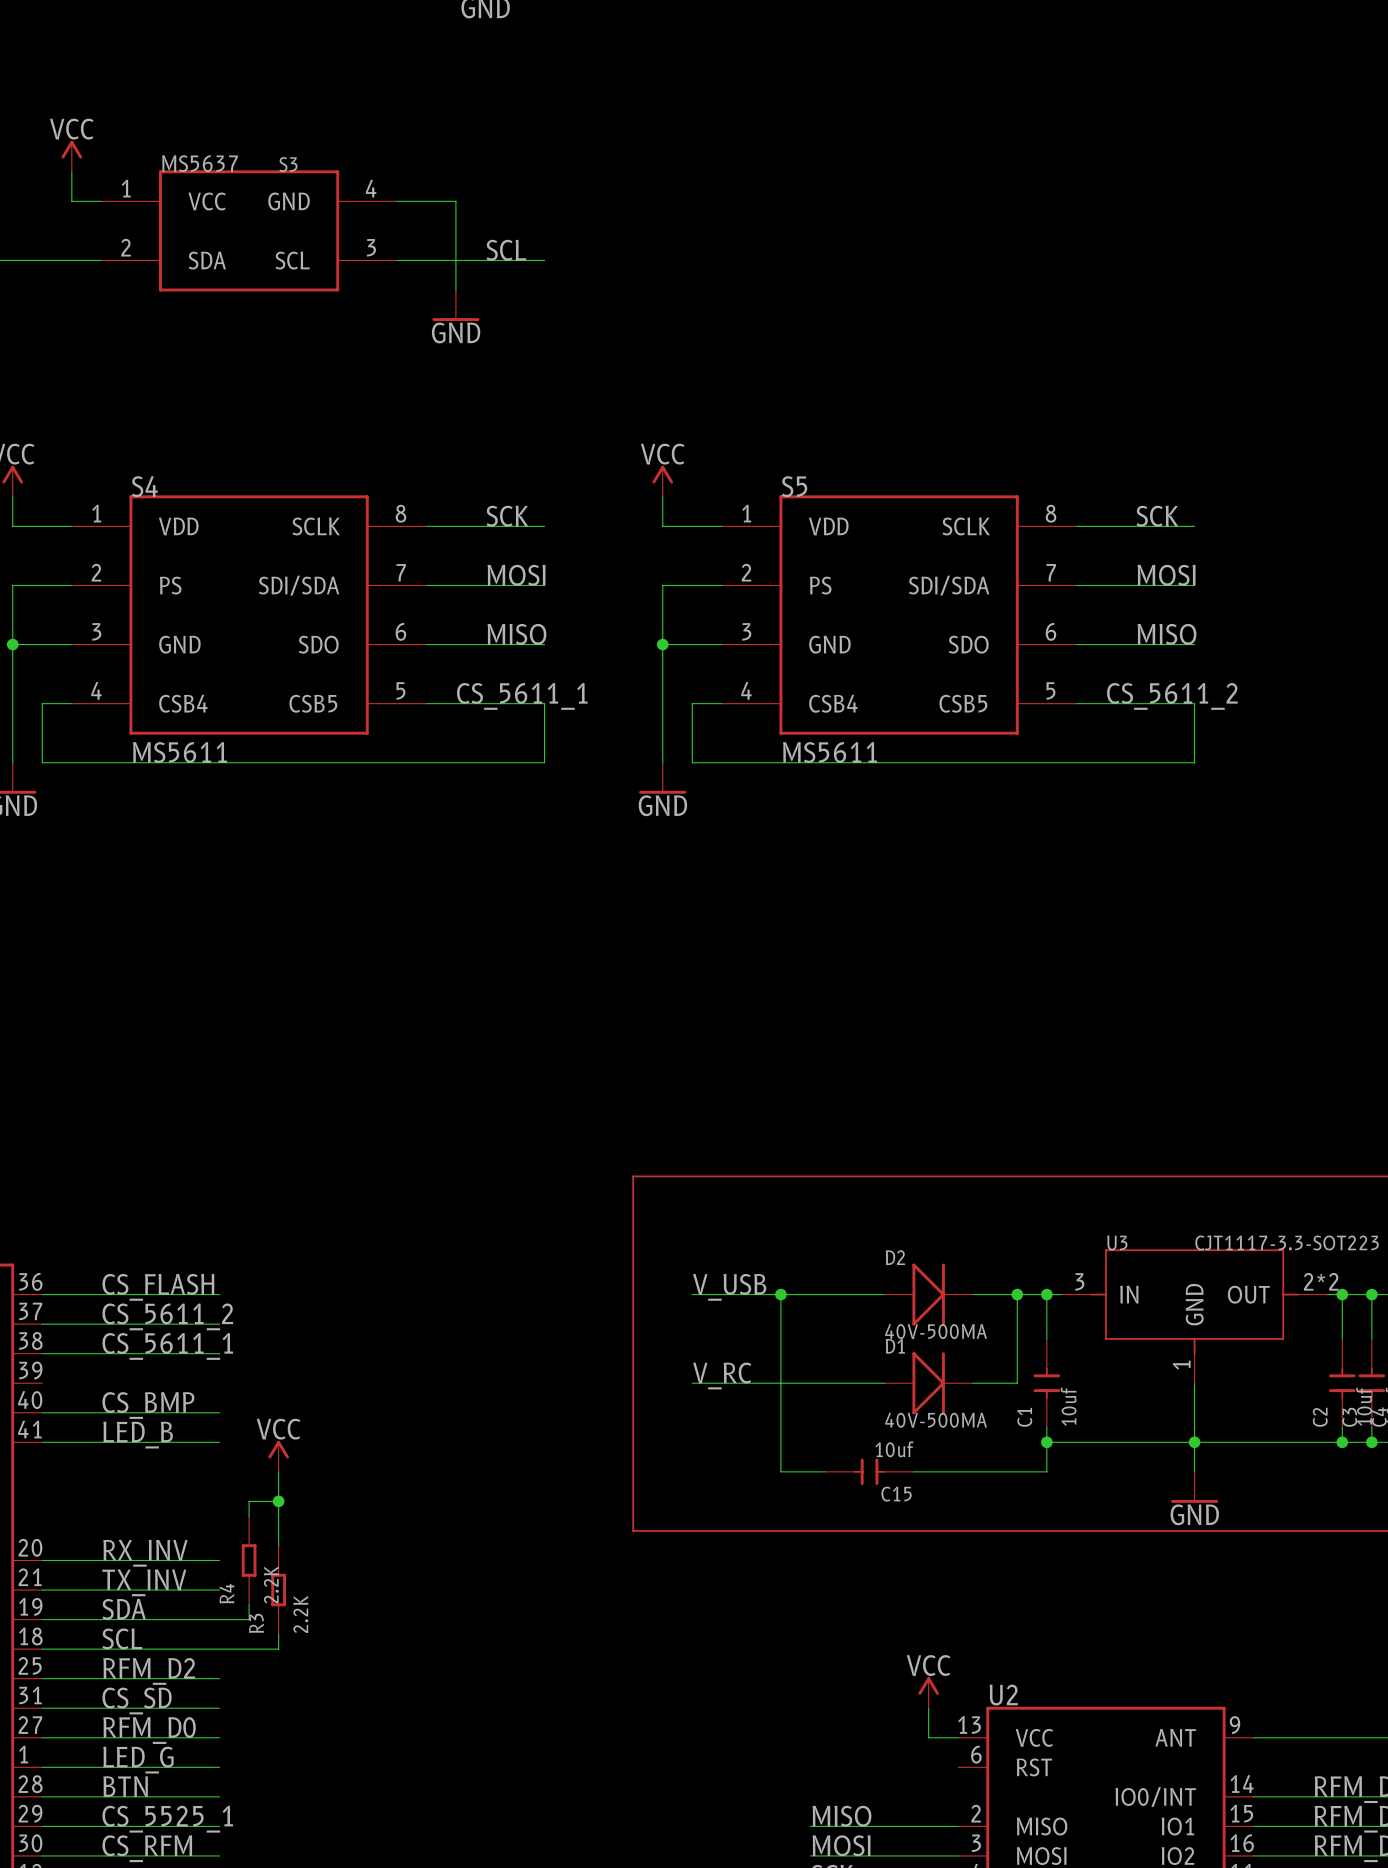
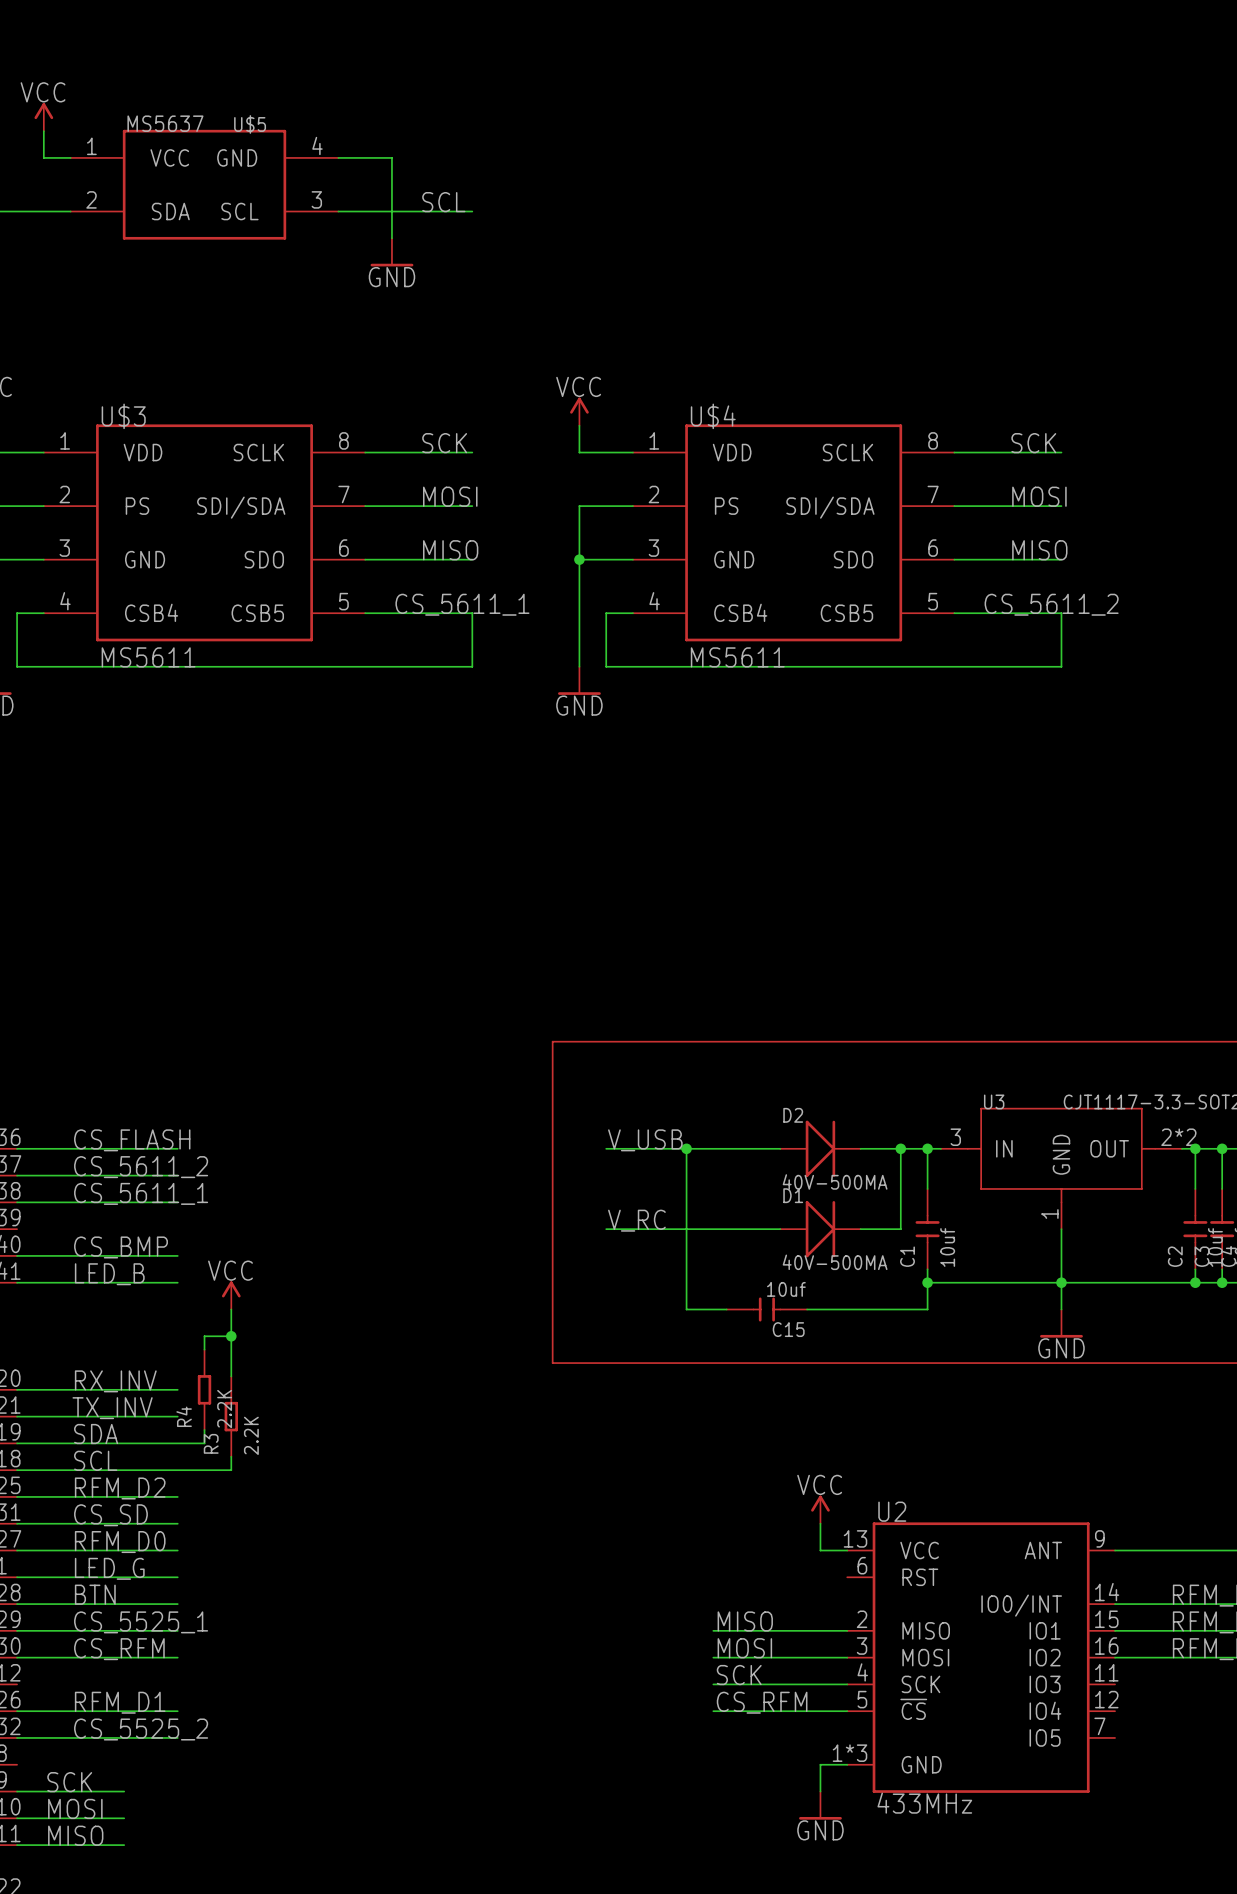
S3 name: S3 (288, 164) -> U$5 (250, 124)
S4 name: S4 (144, 486) -> U$3 (123, 416)
S5 name: S5 (794, 486) -> U$4 (713, 416)

